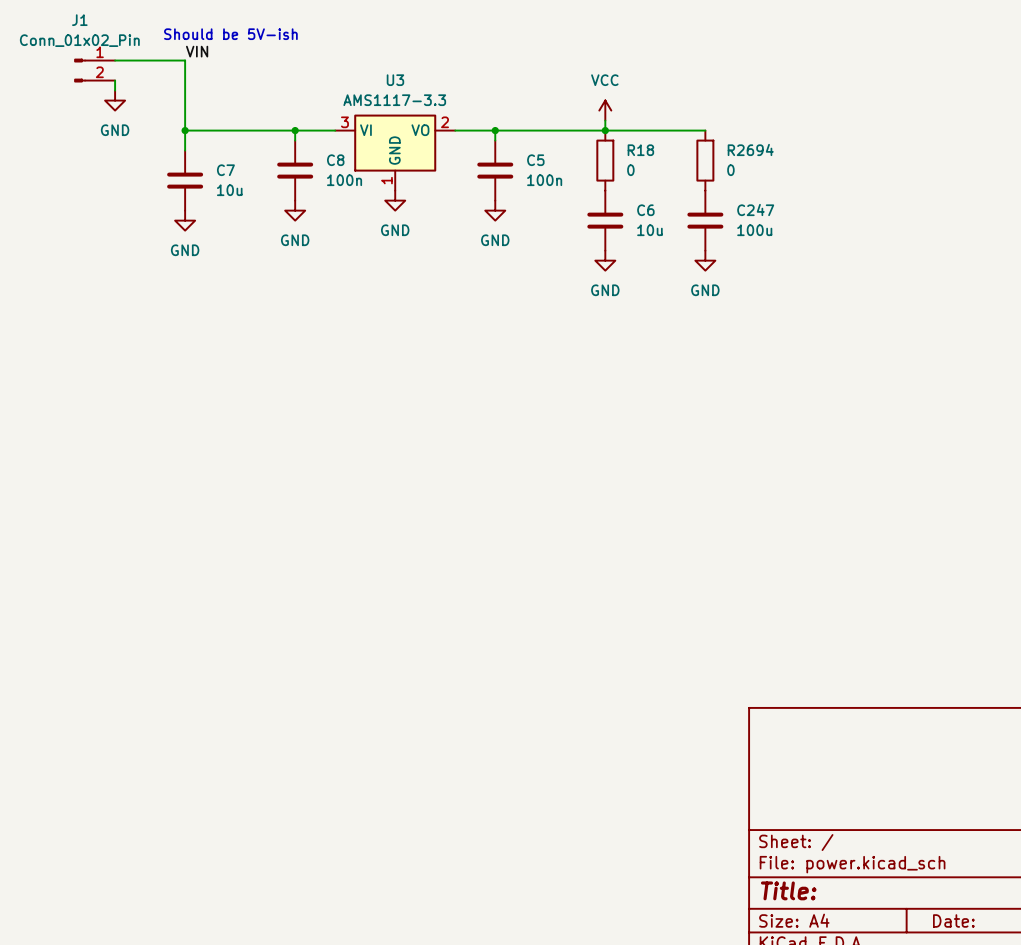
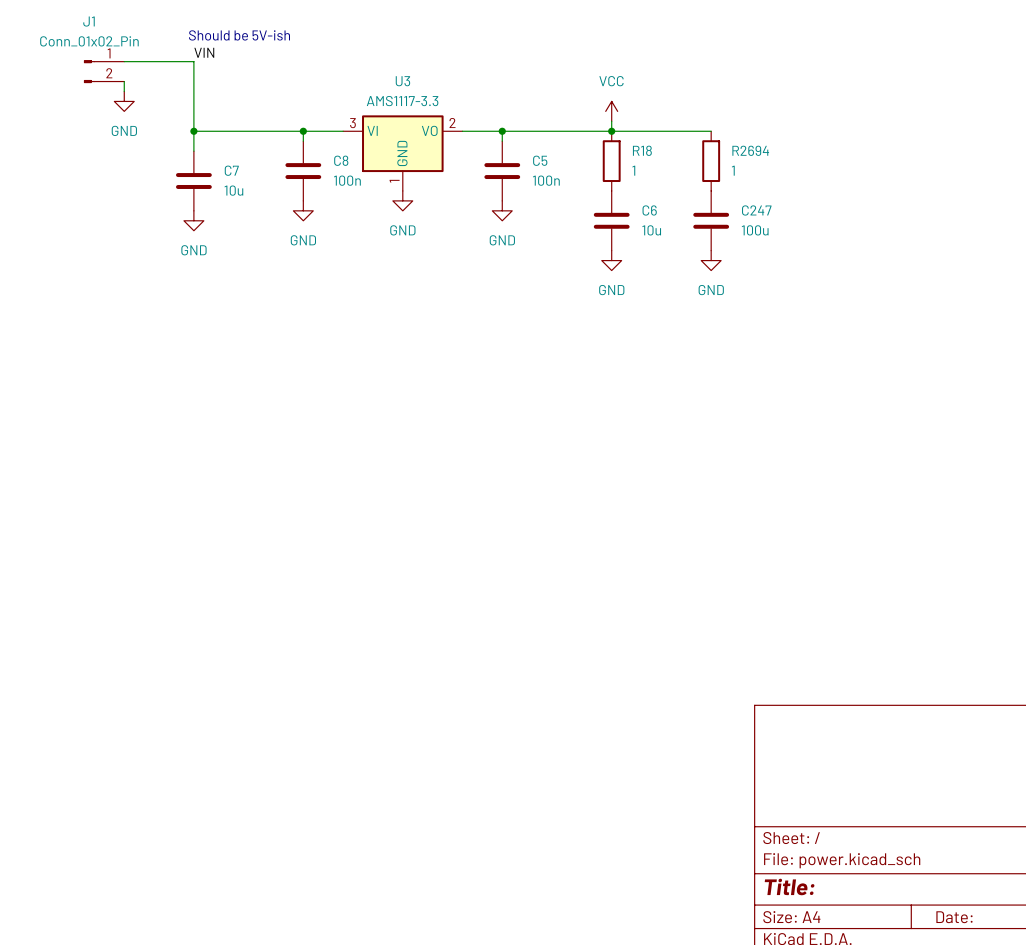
R18 value: 0 (630, 170) -> 1 (633, 170)
R2694 value: 0 (730, 170) -> 1 (733, 170)

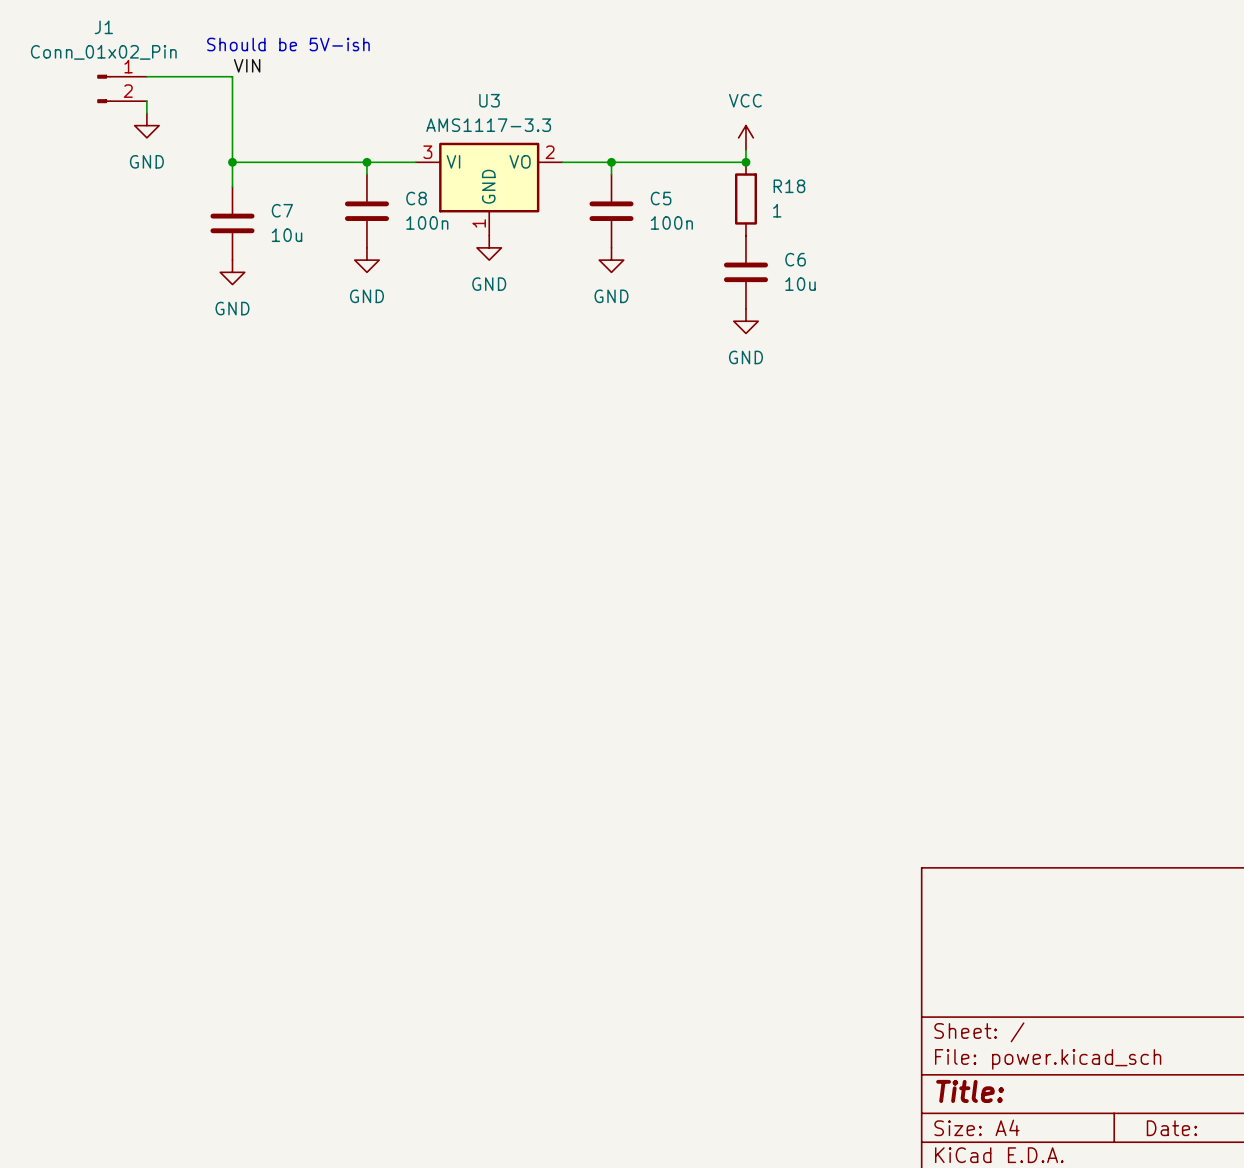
wire: (611, 131) (711, 131) -> none
R2694: 1 (711, 161) -> none
C247: 100u (711, 220) -> none
power symbol: GND (711, 260) -> none

